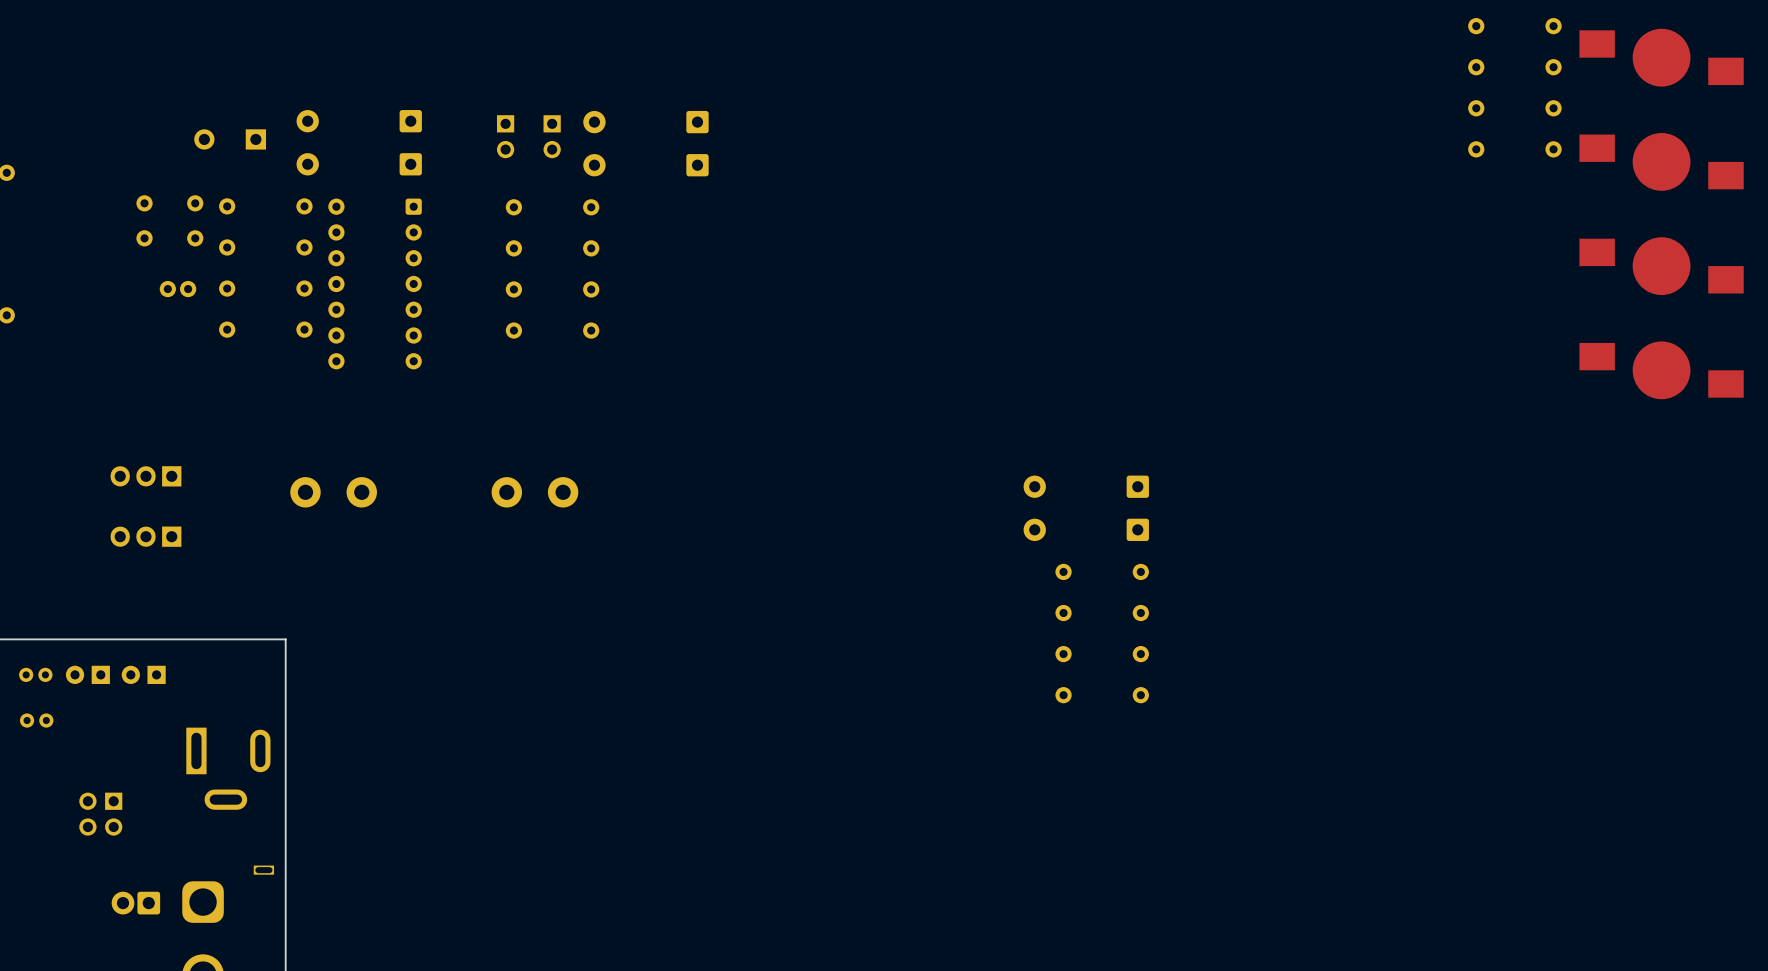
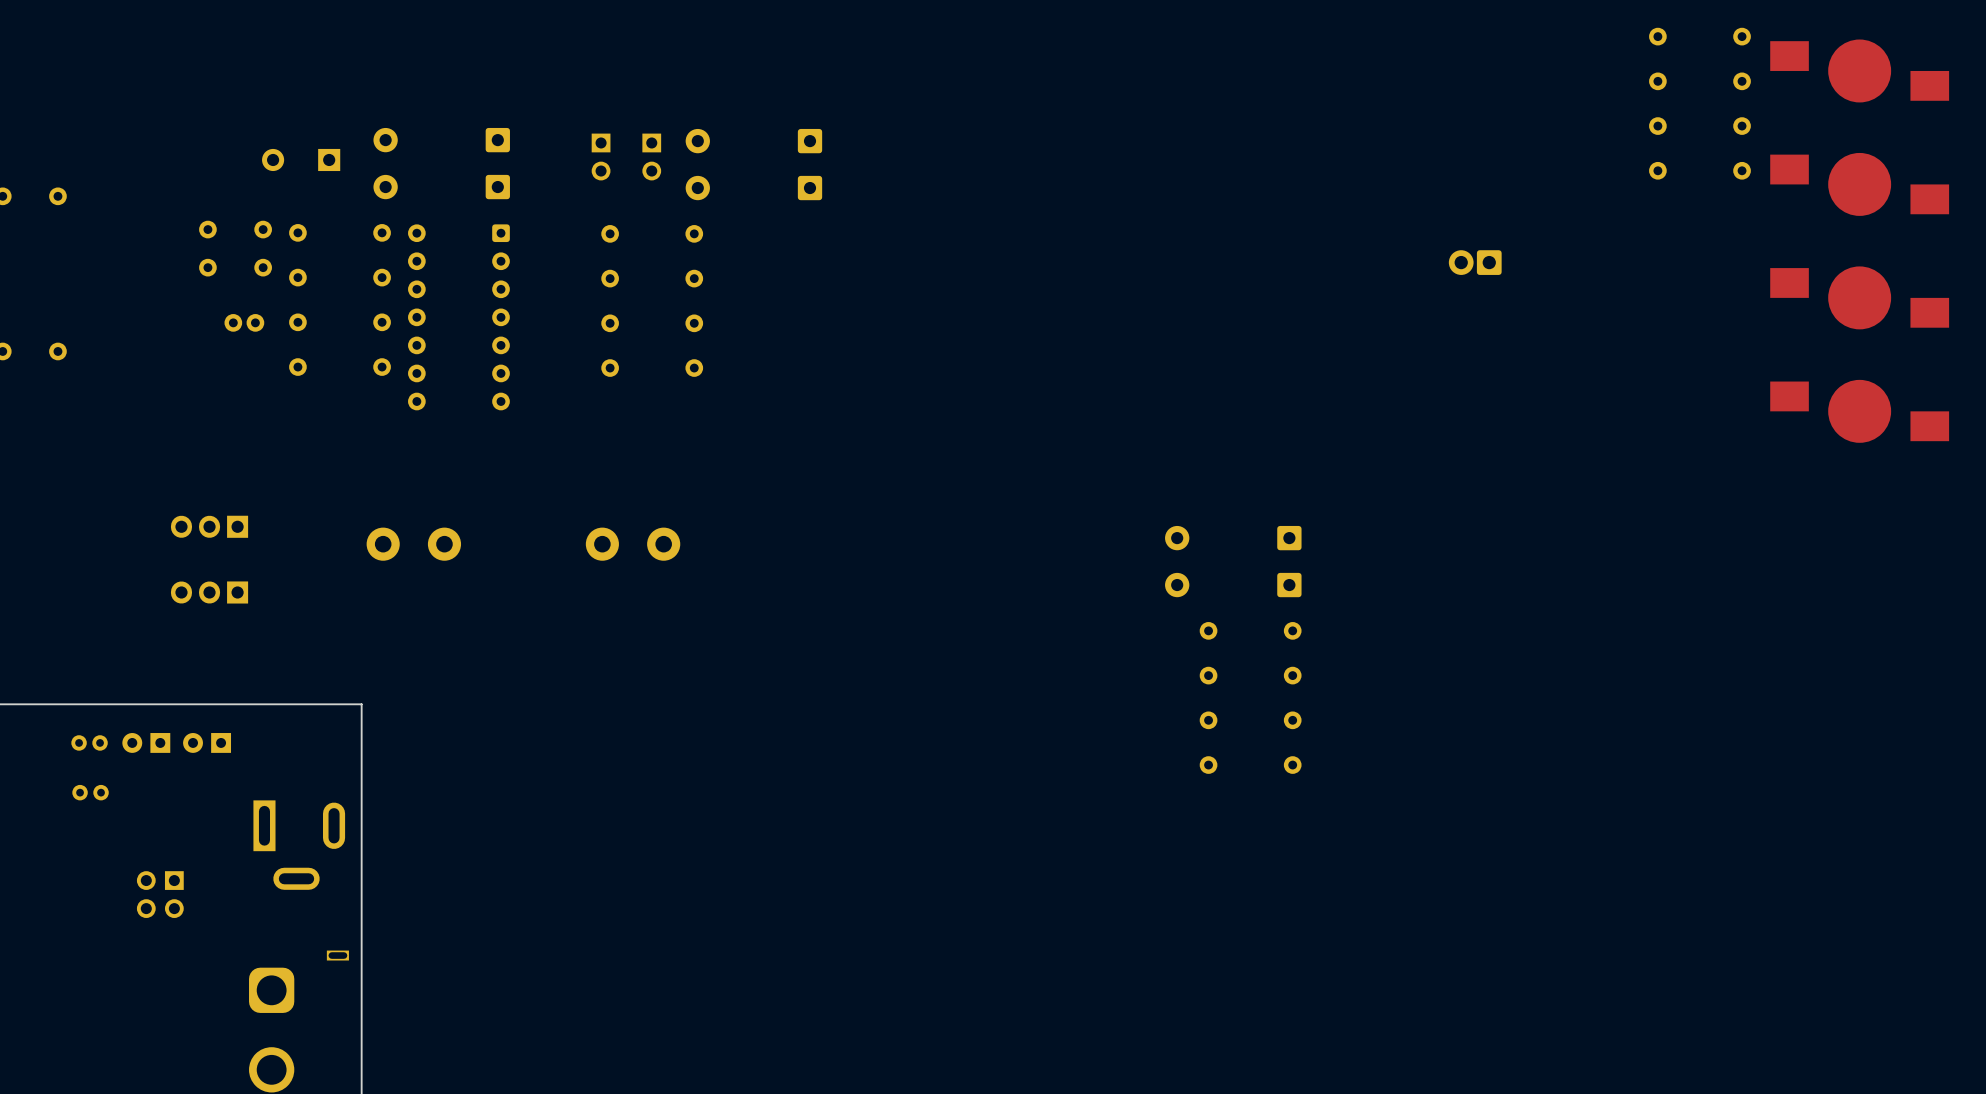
part: none -> (1475, 262)
part: (135, 903) -> none

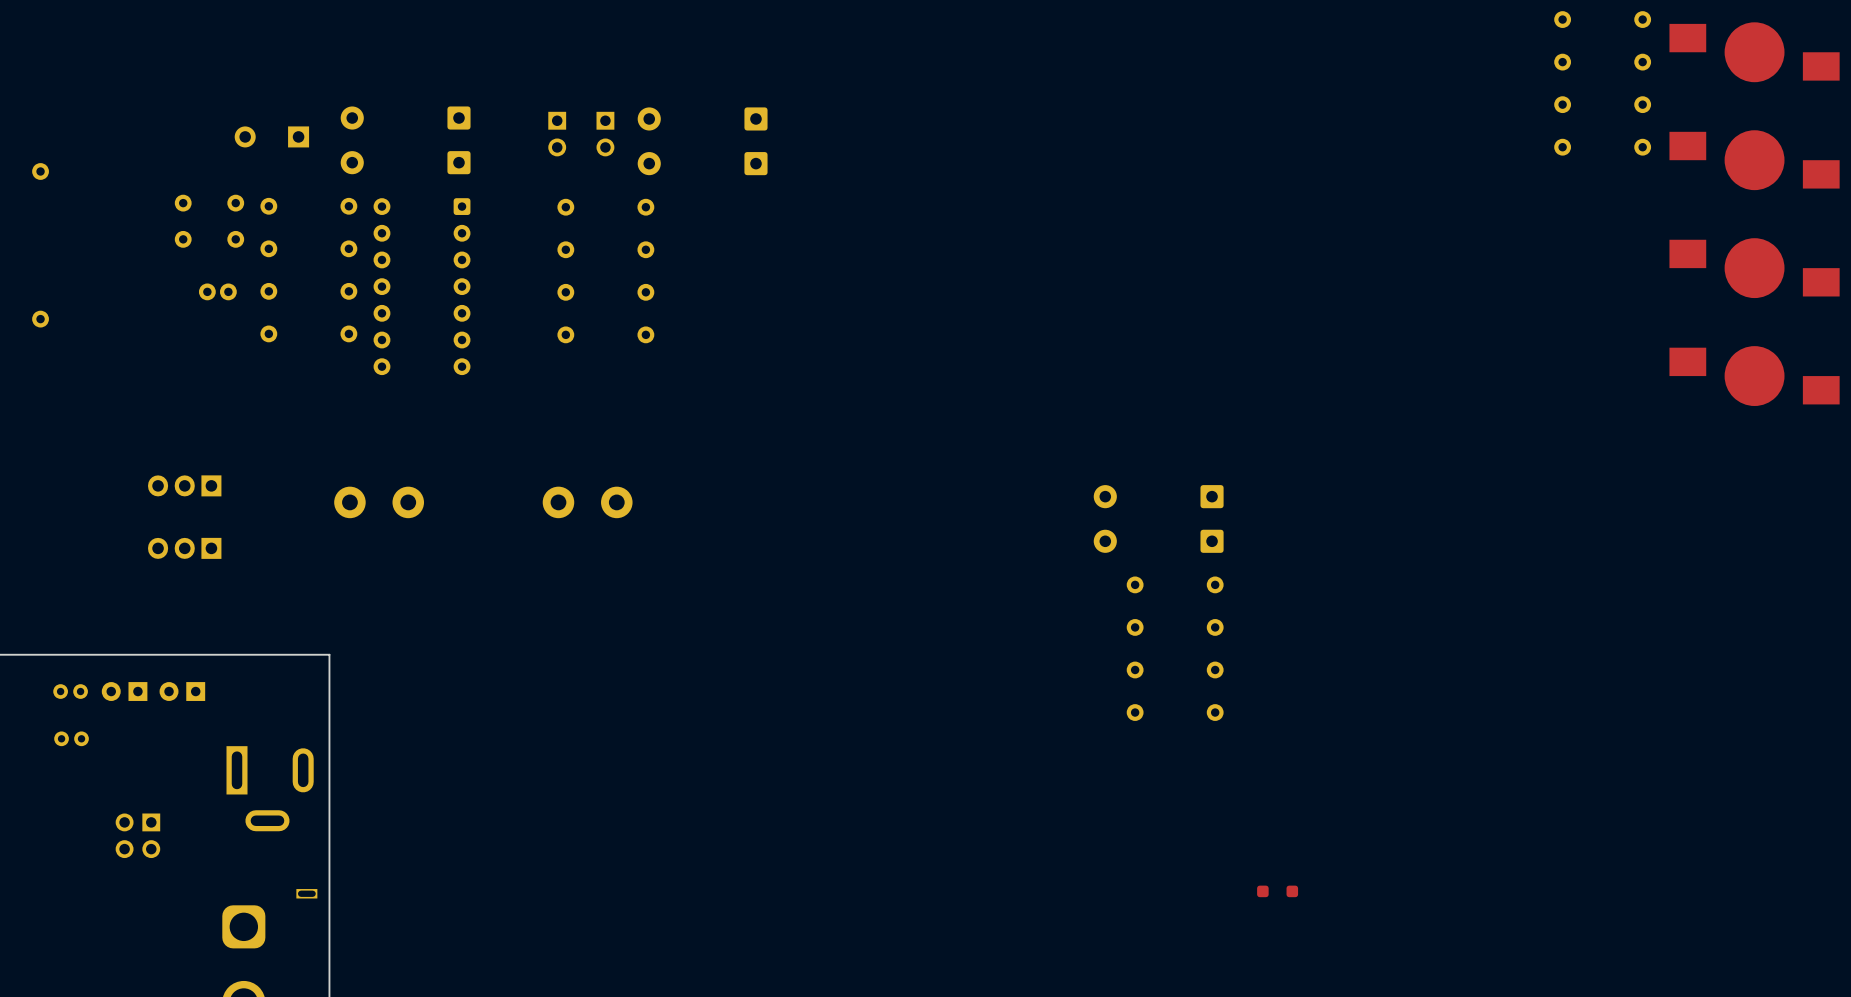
part: (1475, 262) -> none
part: none -> (1277, 891)

